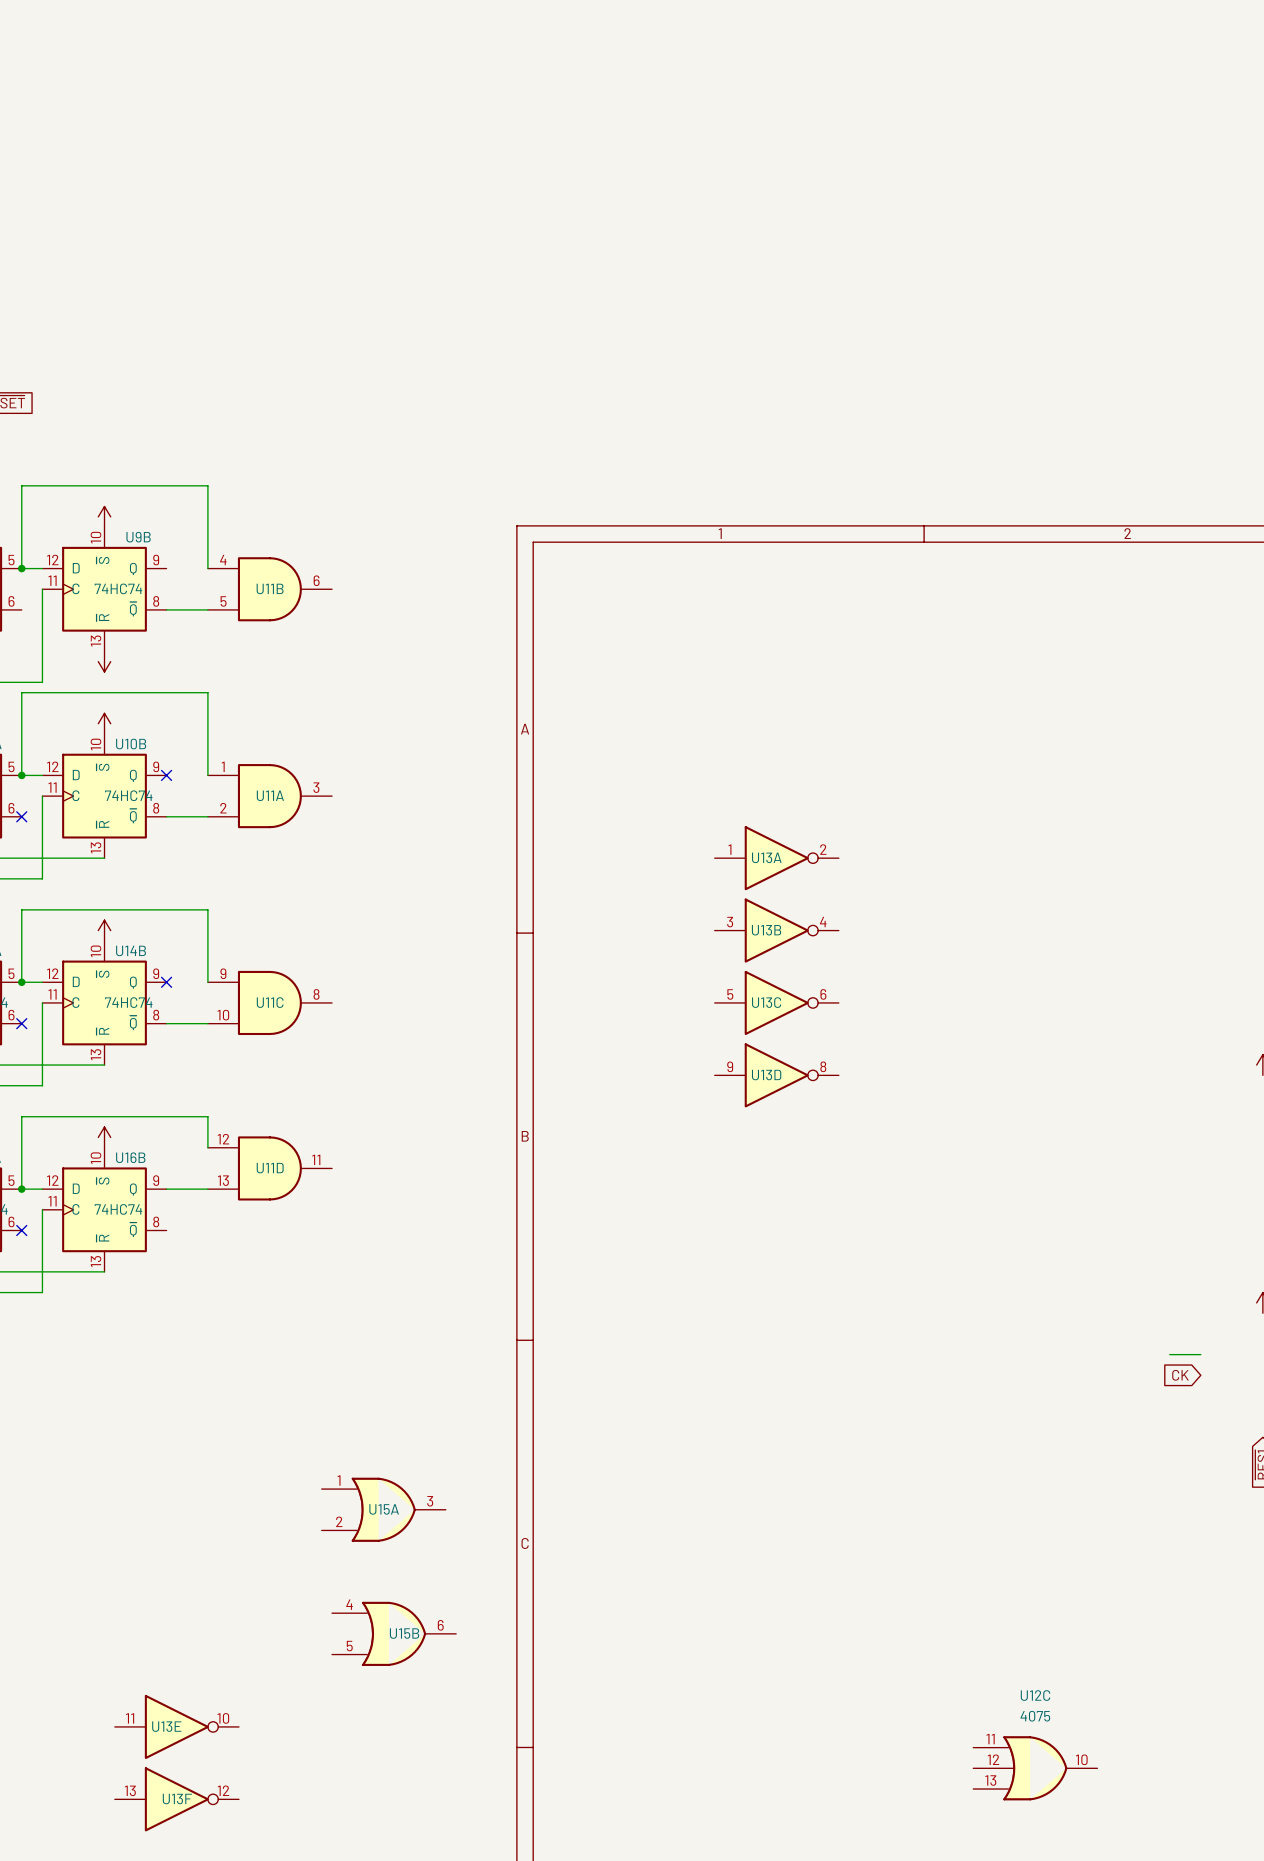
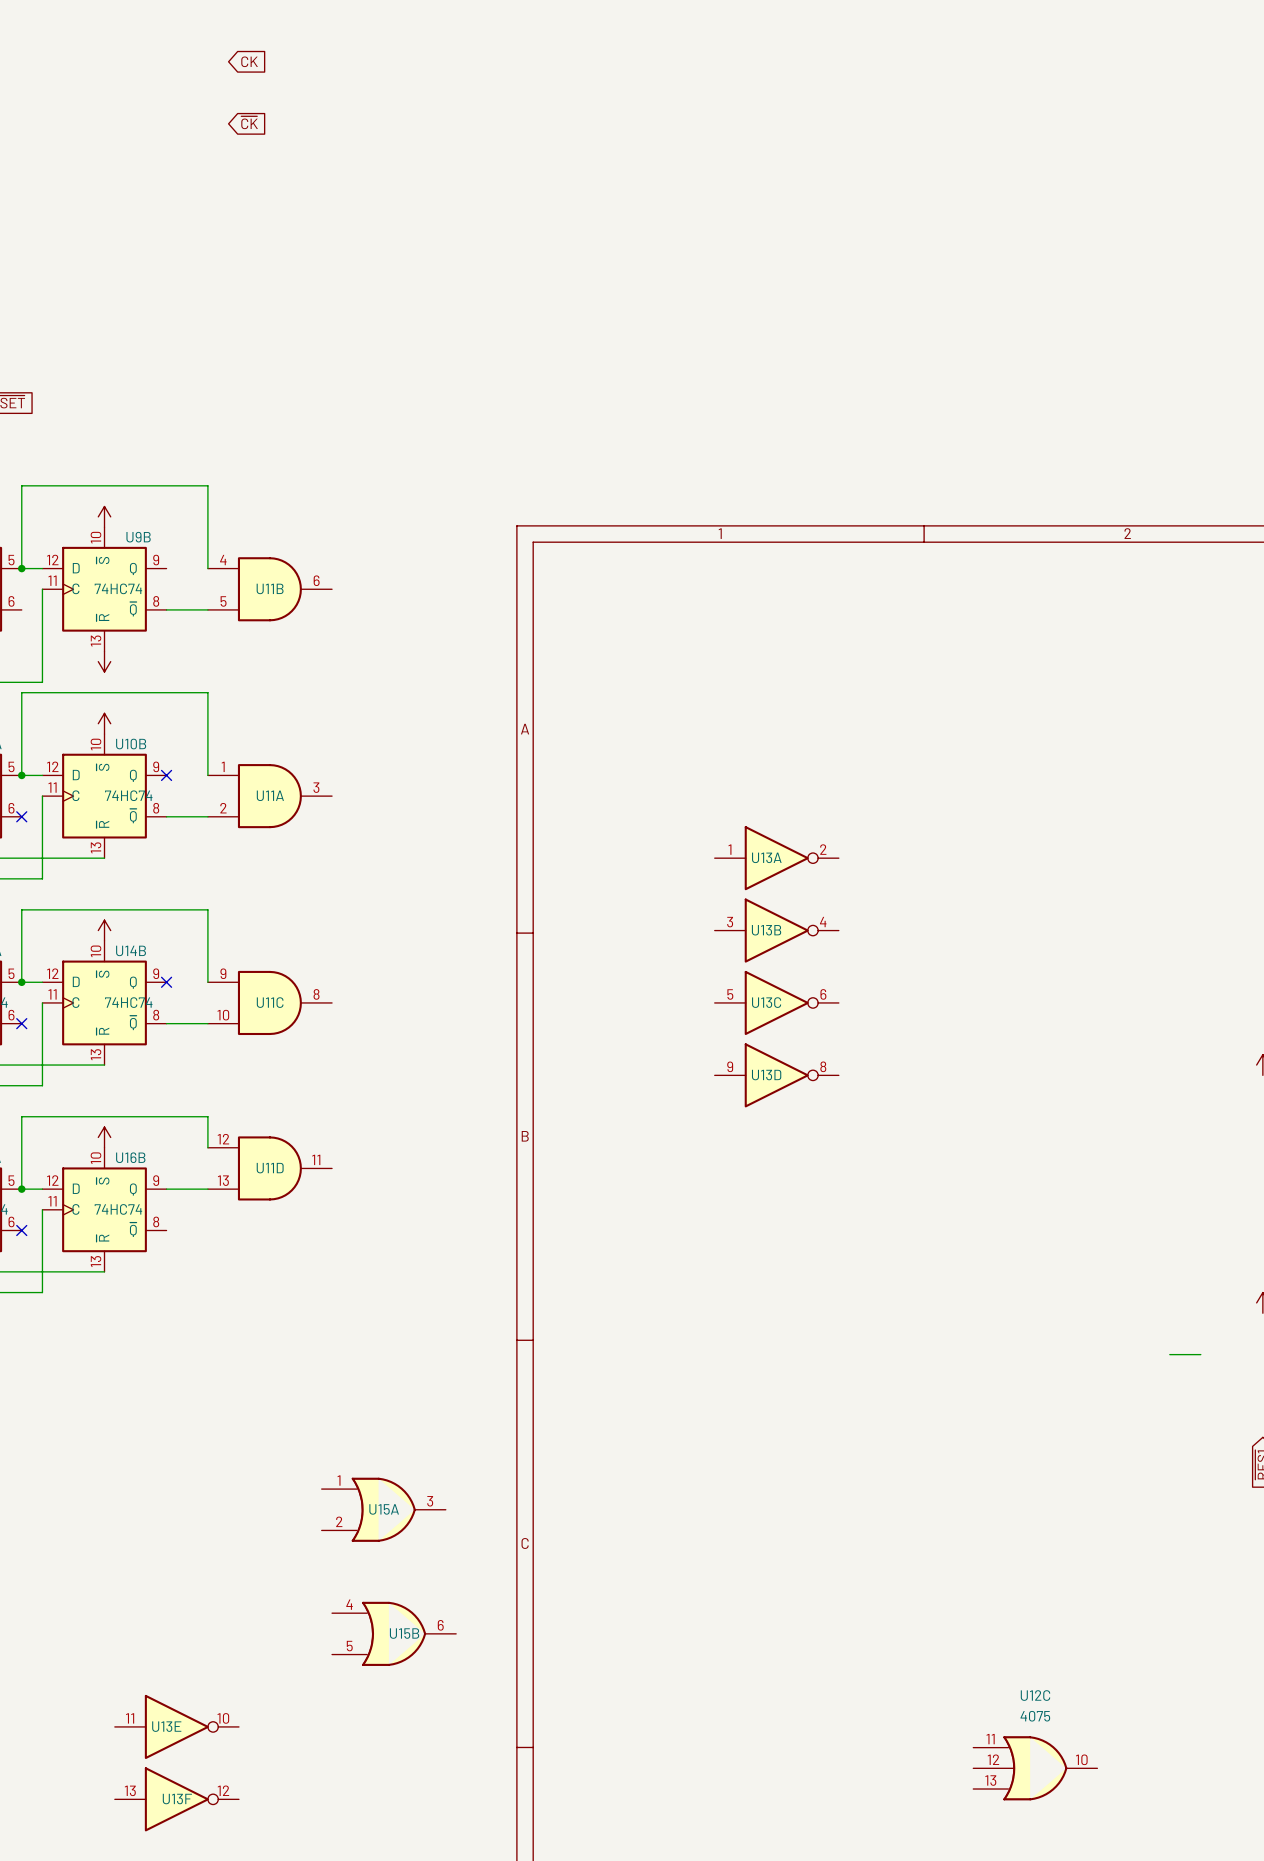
global label: none -> CK (249, 61)
global label: none -> ~{CK} (249, 122)
global label: CK (1180, 1375) -> none

